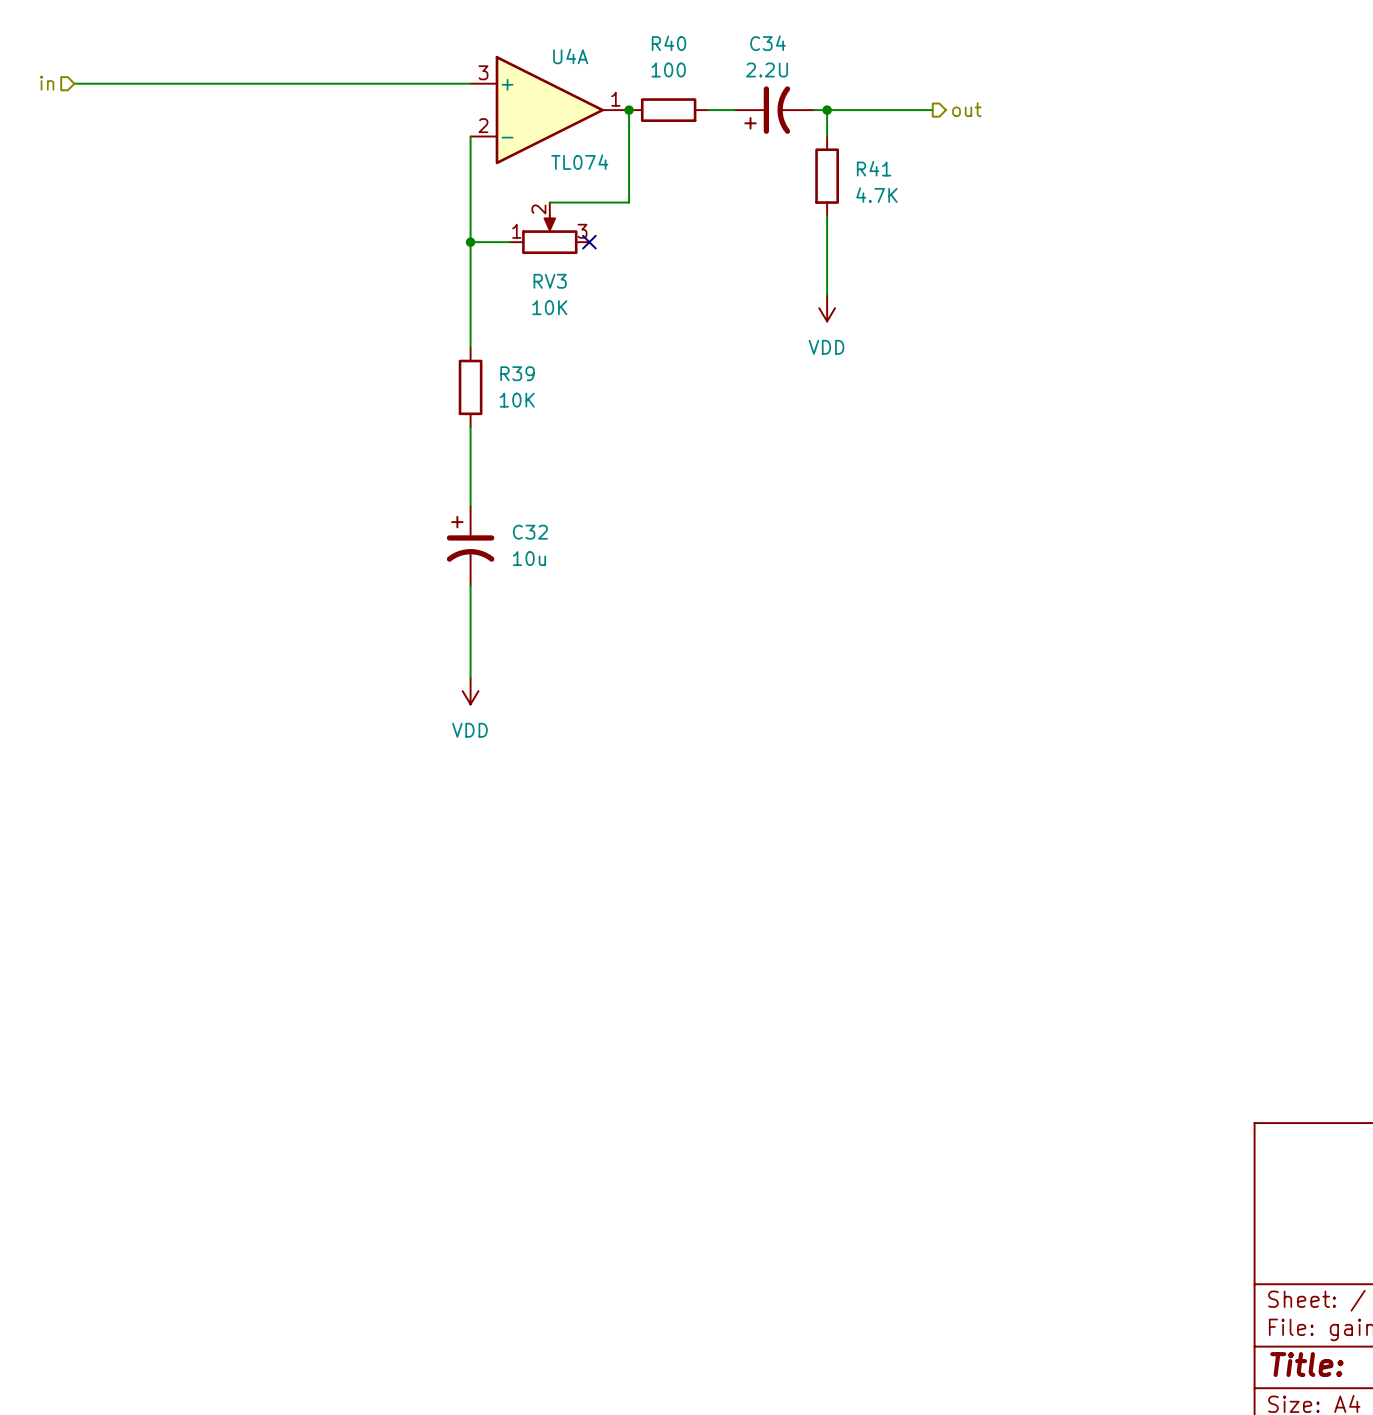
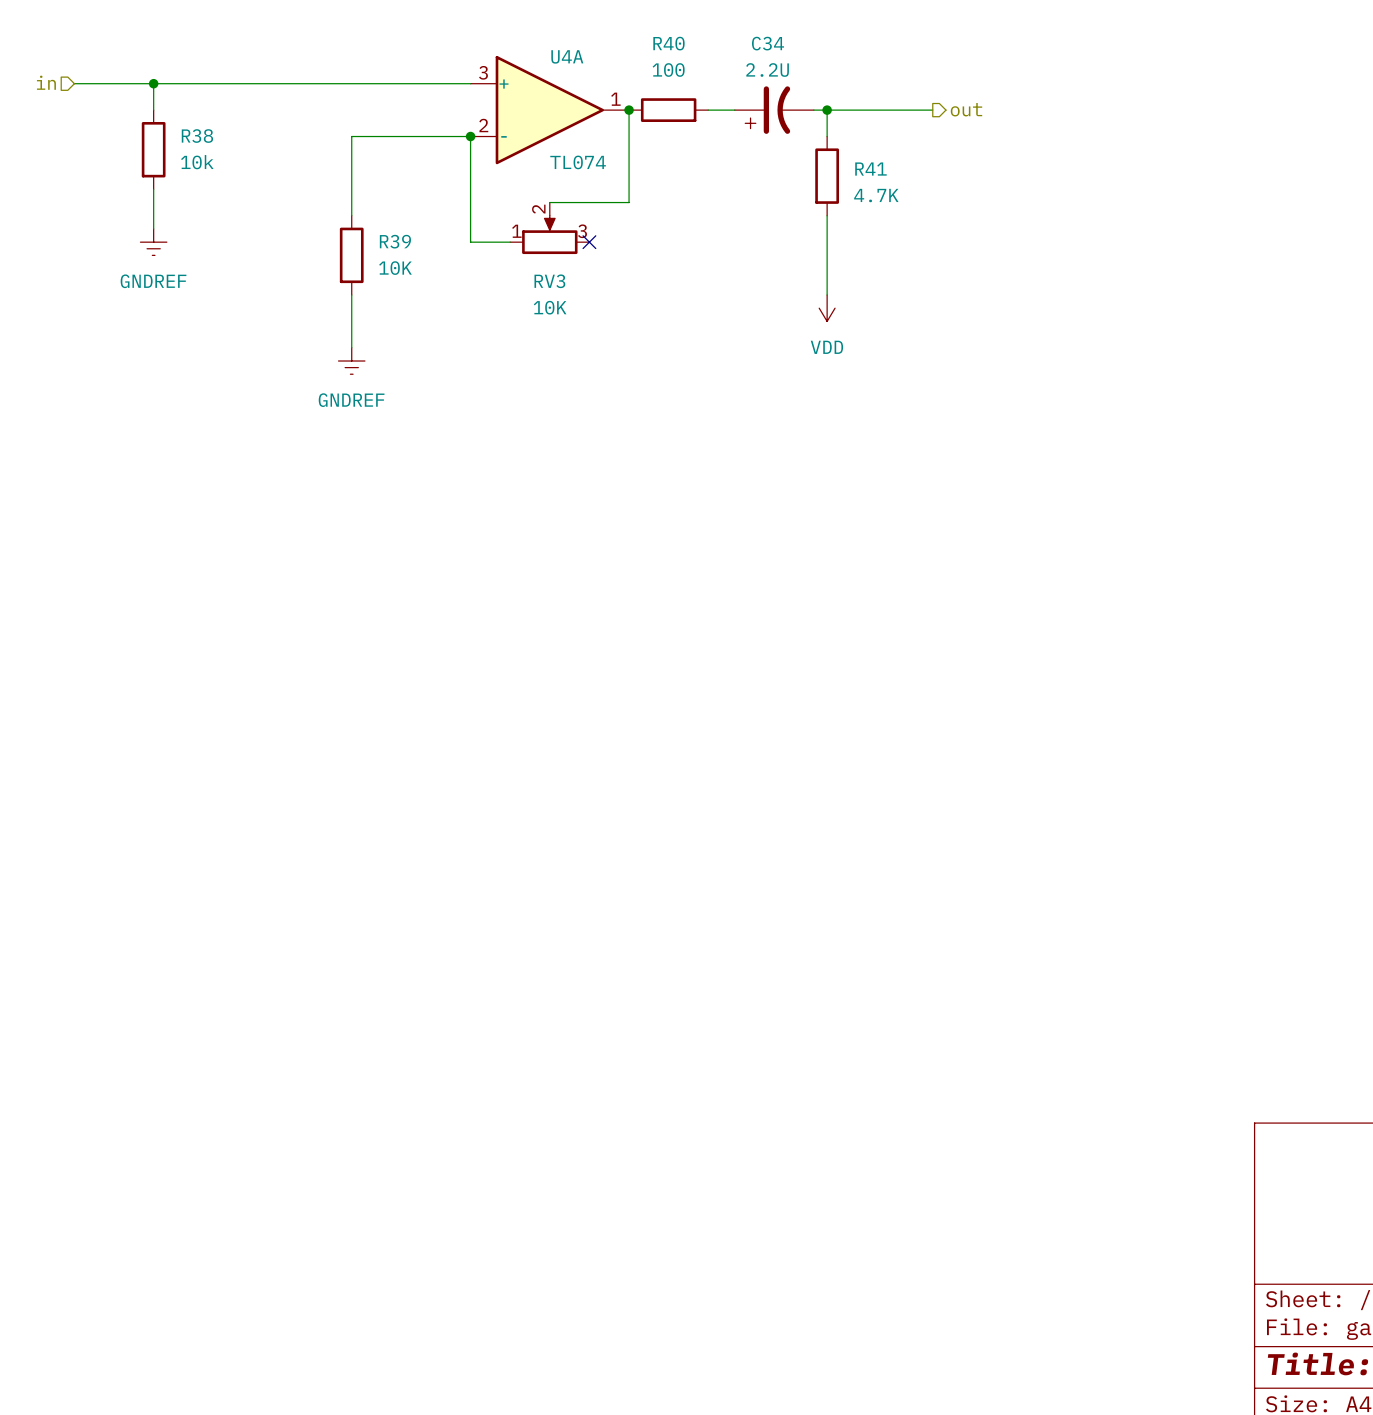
wire: none -> (153, 83) (153, 110)
junction: none -> (153, 83)
wire: none -> (470, 136) (351, 136) (351, 215)
junction: none -> (470, 136)
R38: none -> 10k (153, 149)
wire: none -> (153, 189) (153, 228)
power symbol: none -> GNDREF (153, 242)
wire: (470, 242) (470, 347) -> none
junction: (470, 242) -> none
wire: none -> (351, 294) (351, 347)
power symbol: none -> GNDREF (351, 361)
R39 position: (470, 387) -> (351, 255)
wire: (470, 427) (470, 506) -> none
C32: 10u (470, 545) -> none
wire: (470, 585) (470, 677) -> none
power symbol: VDD (470, 691) -> none

